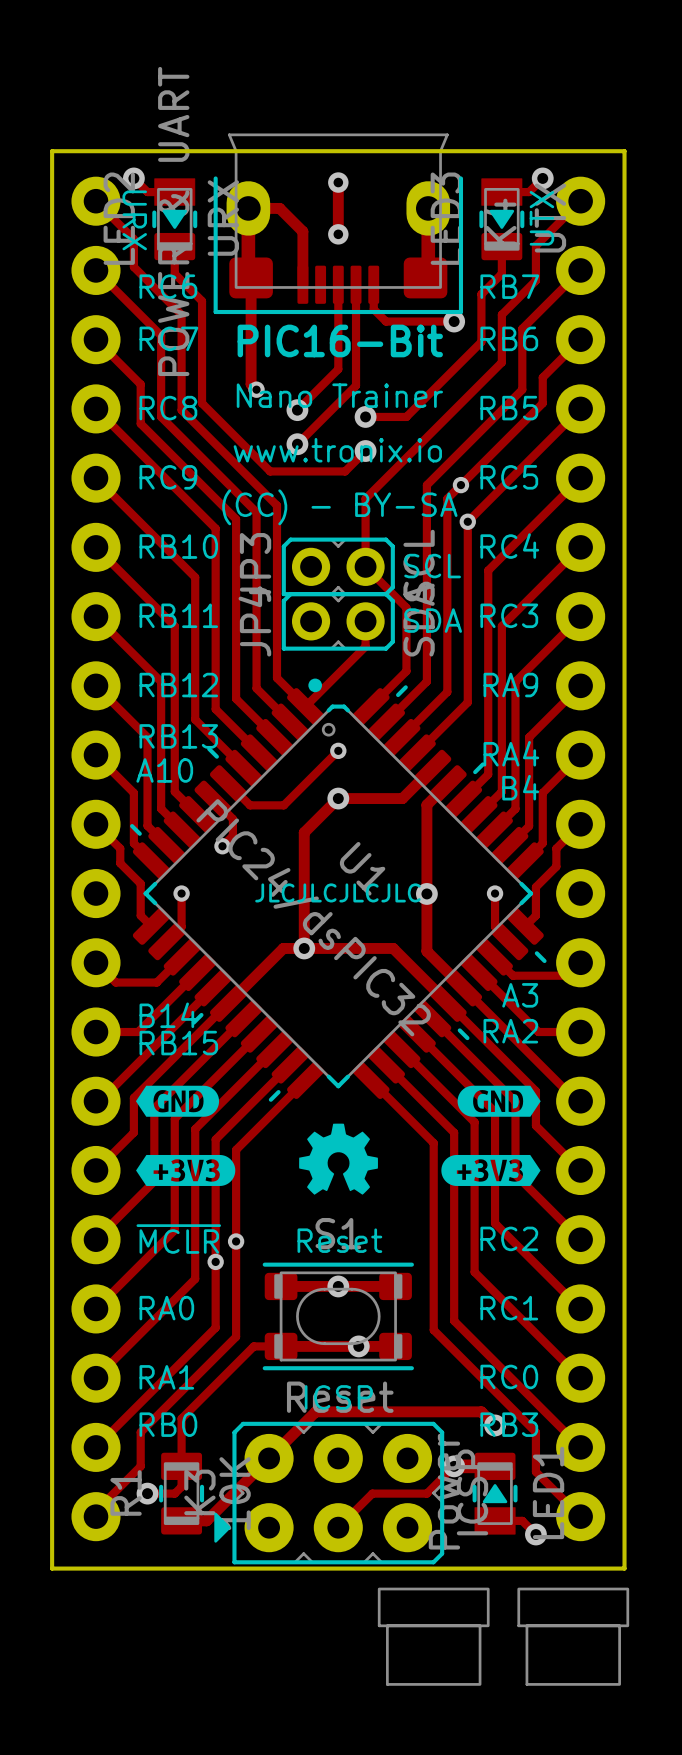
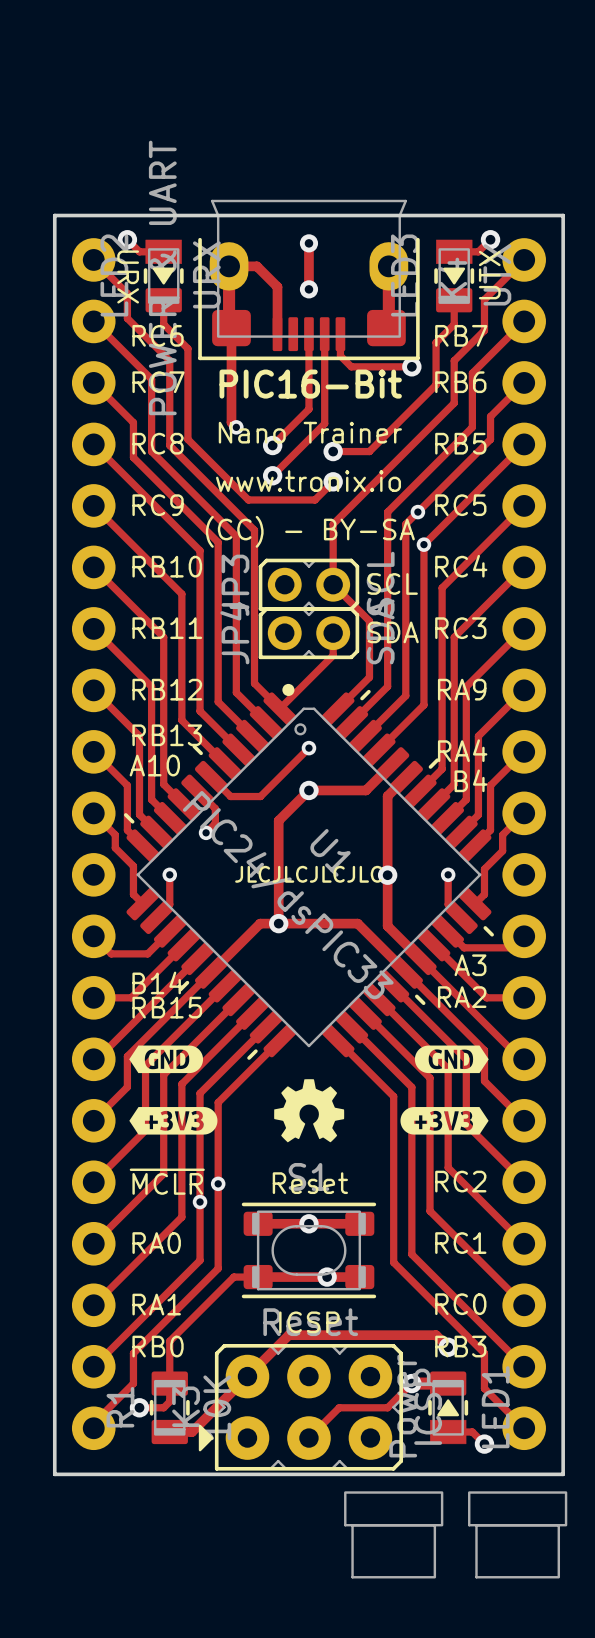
U1 footprint: [130, 678, 547, 1102] -> [123, 683, 494, 1060]
U1 value: PIC24/dsPIC32 (313, 917) -> PIC24/dsPIC33 (288, 895)

